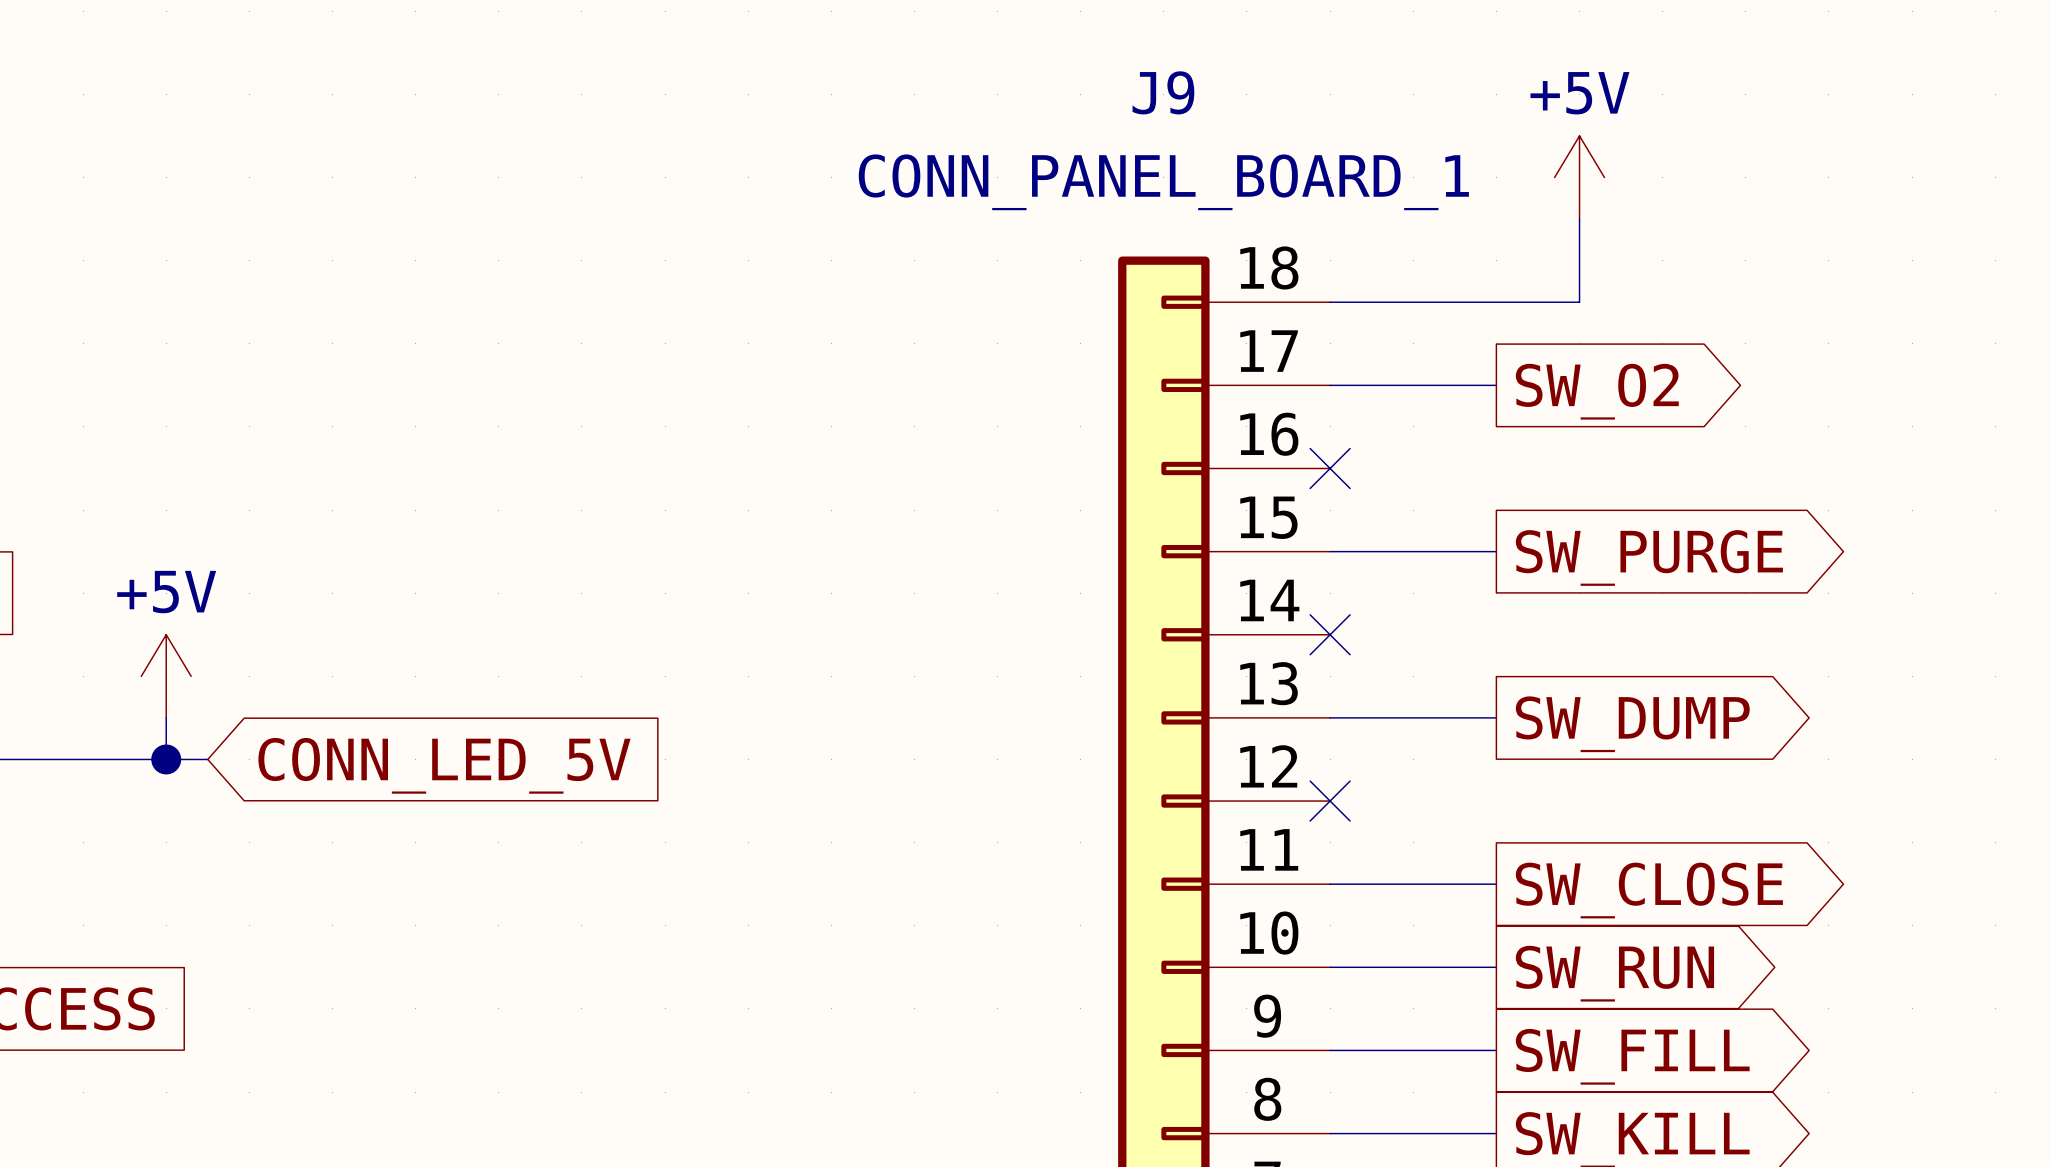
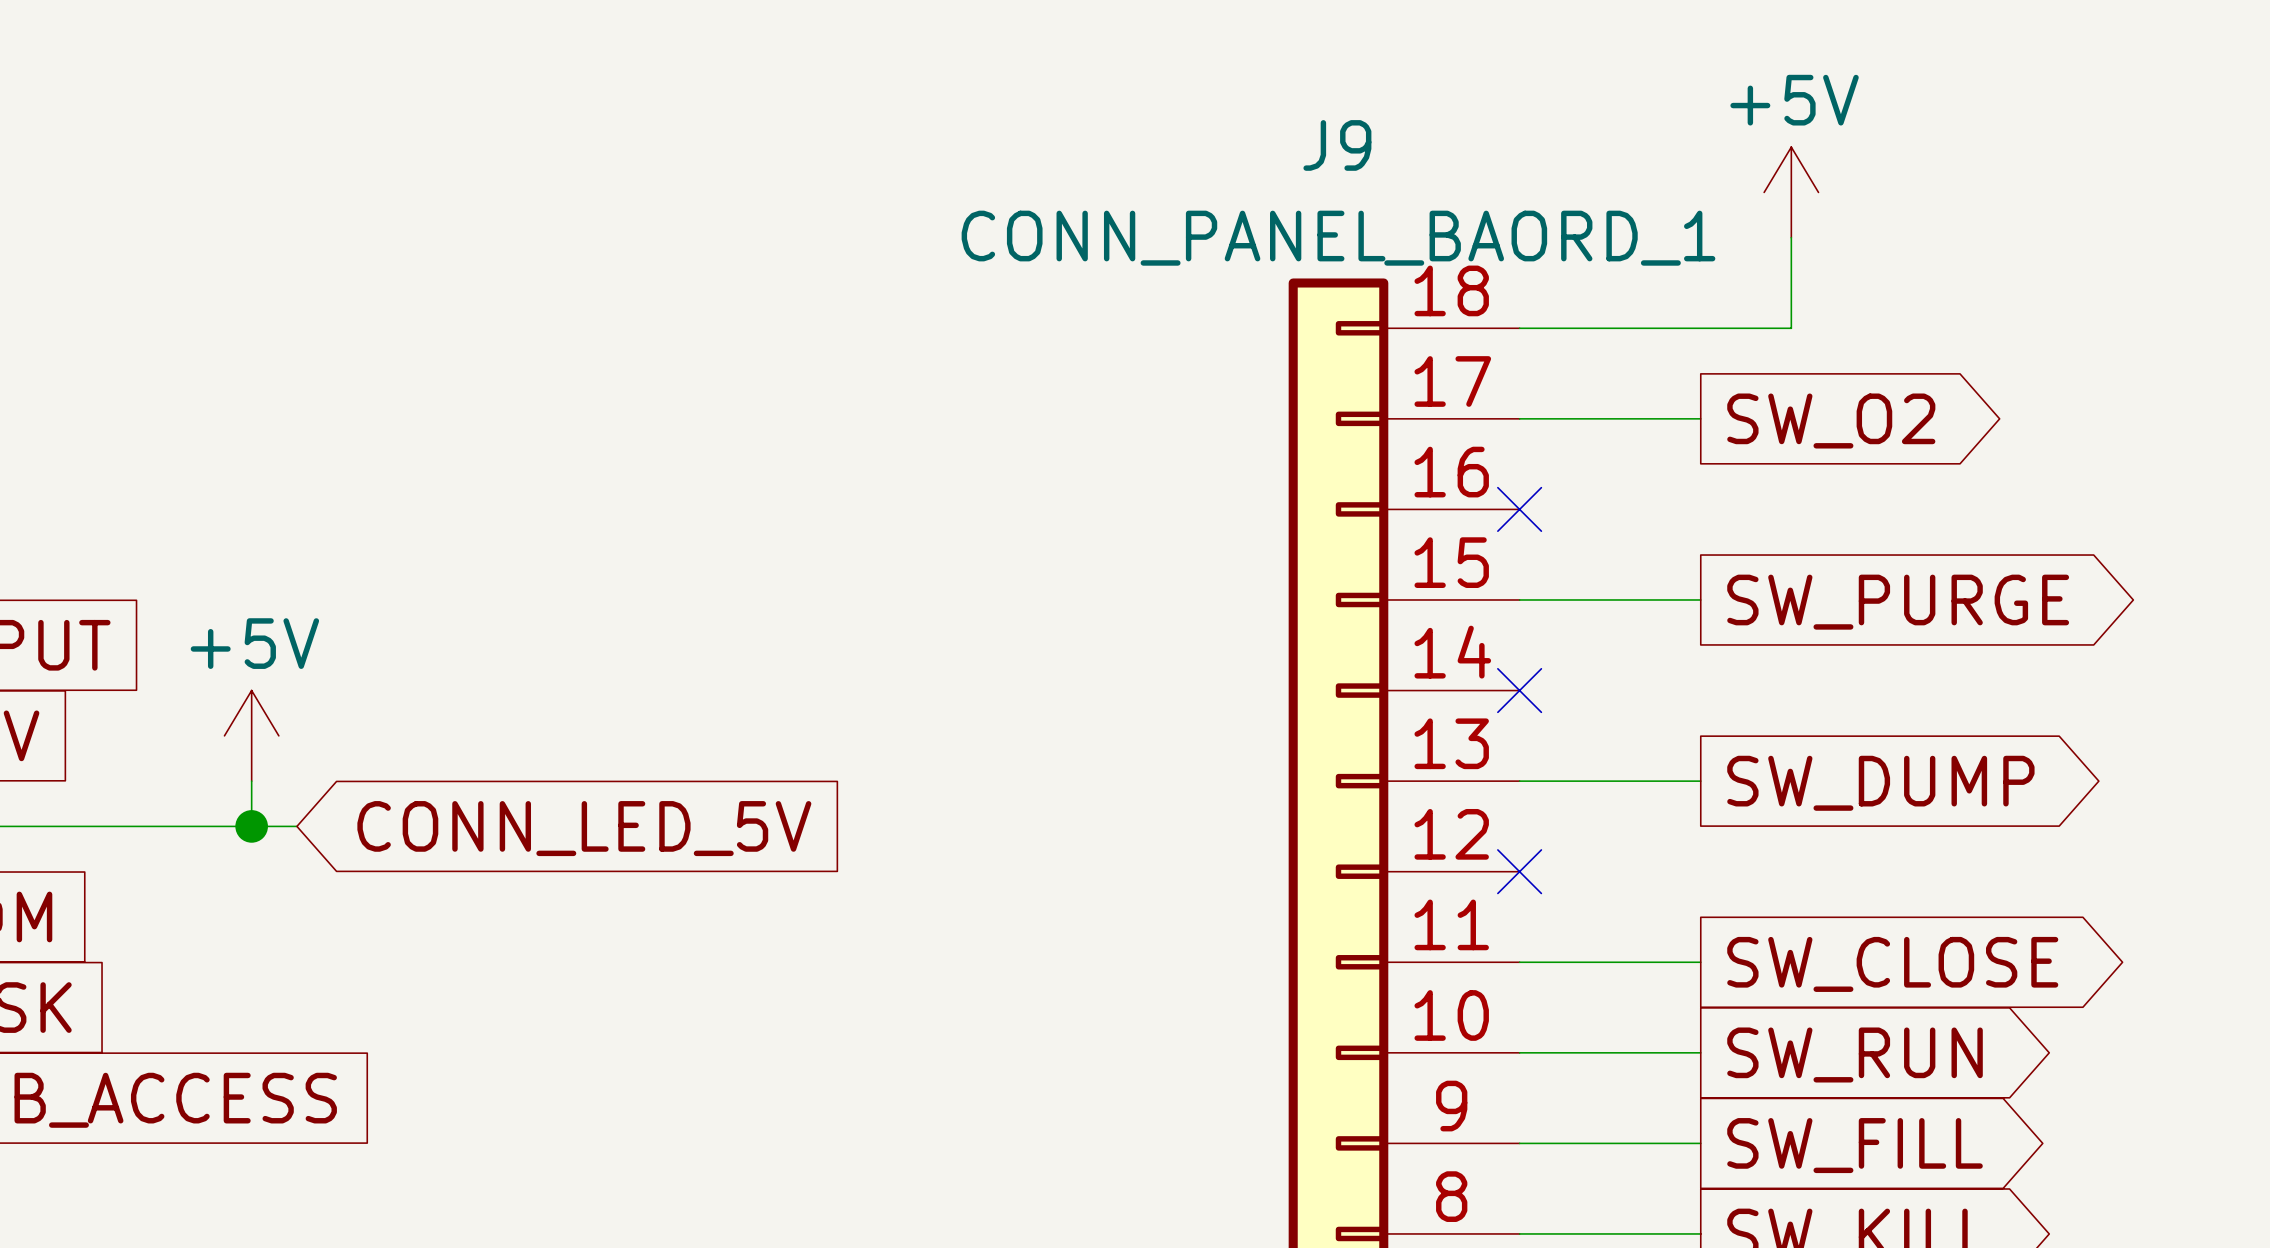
J9 name position: J9 (1163, 92) -> J9 (1337, 145)
J9 value: CONN_PANEL_BOARD_1 (1163, 182) -> CONN_PANEL_BAORD_1 (1338, 238)

